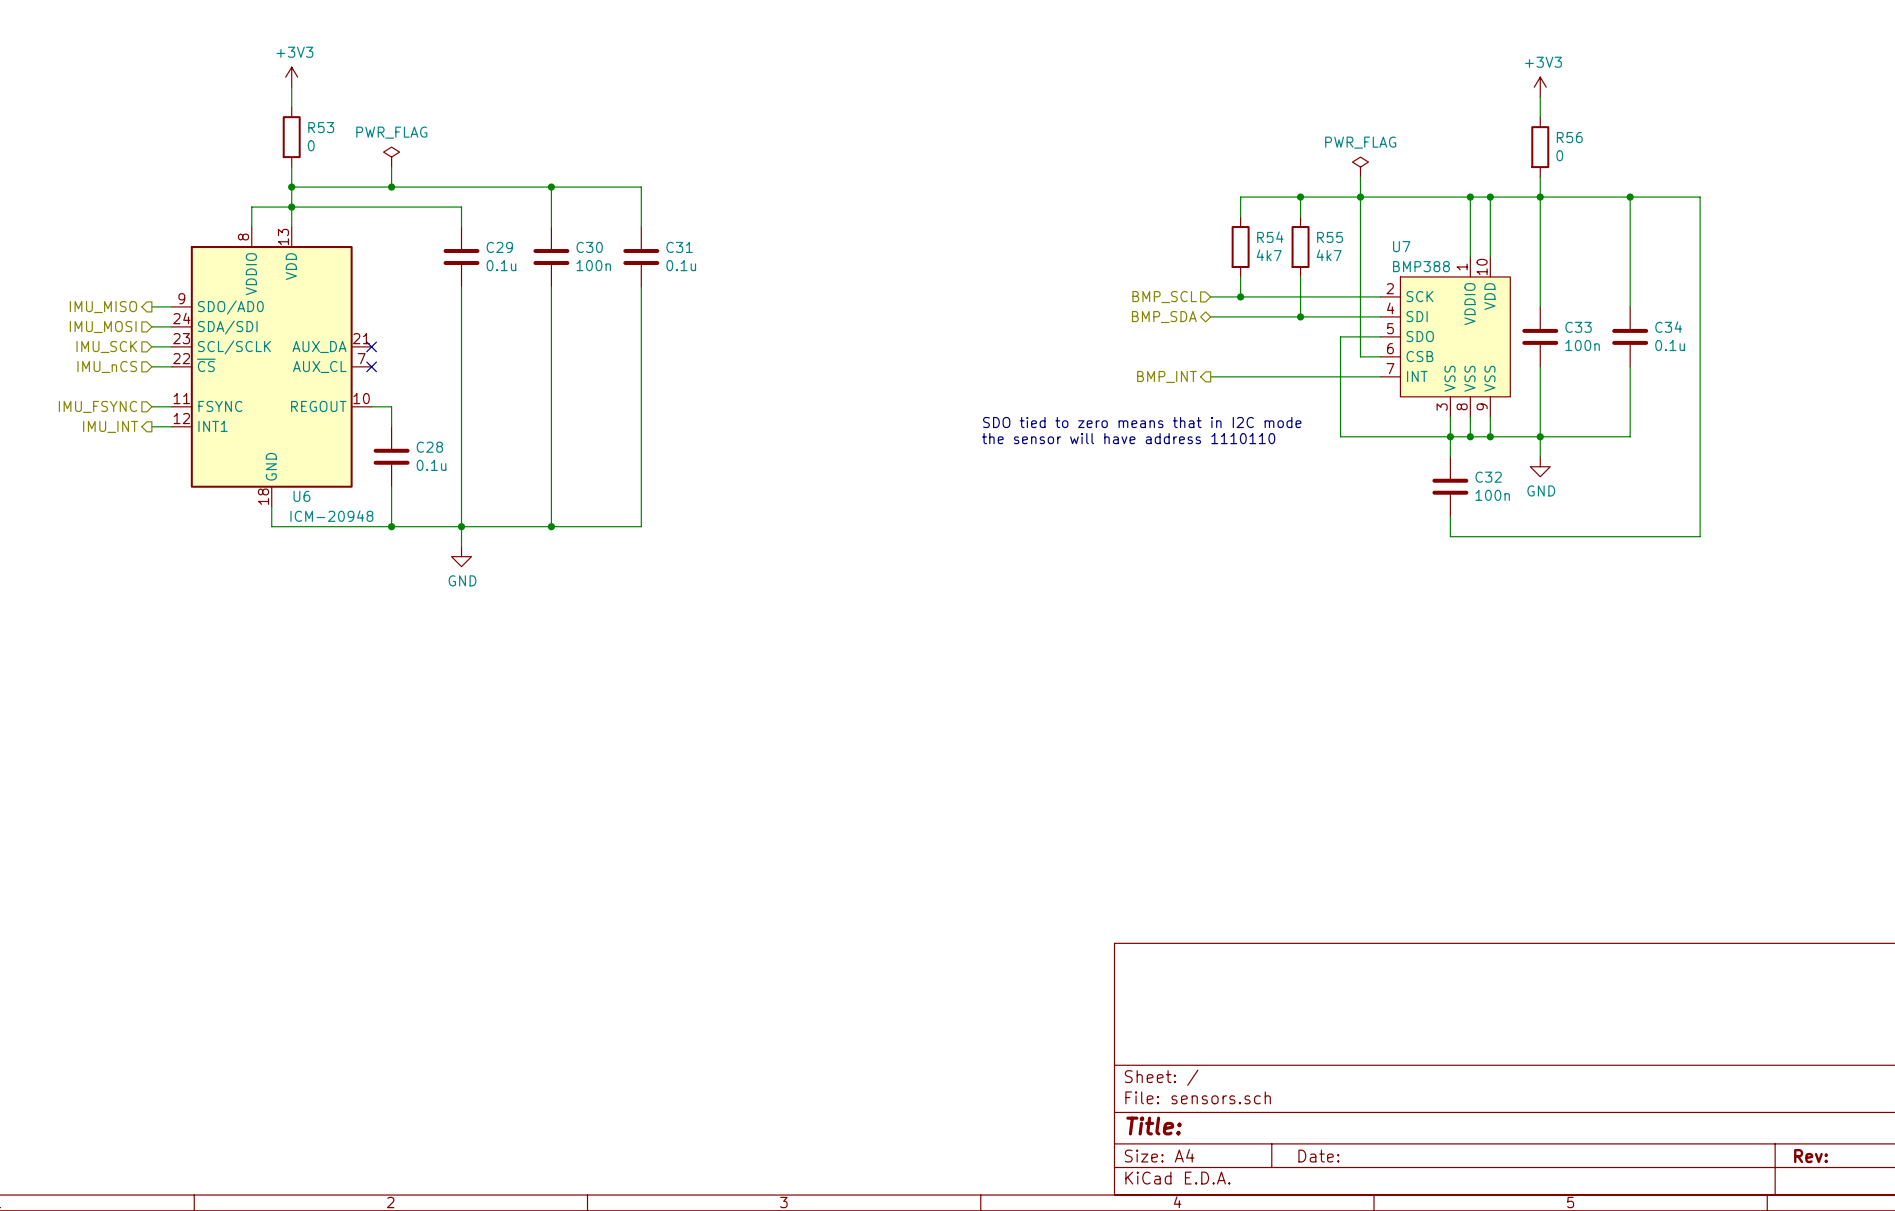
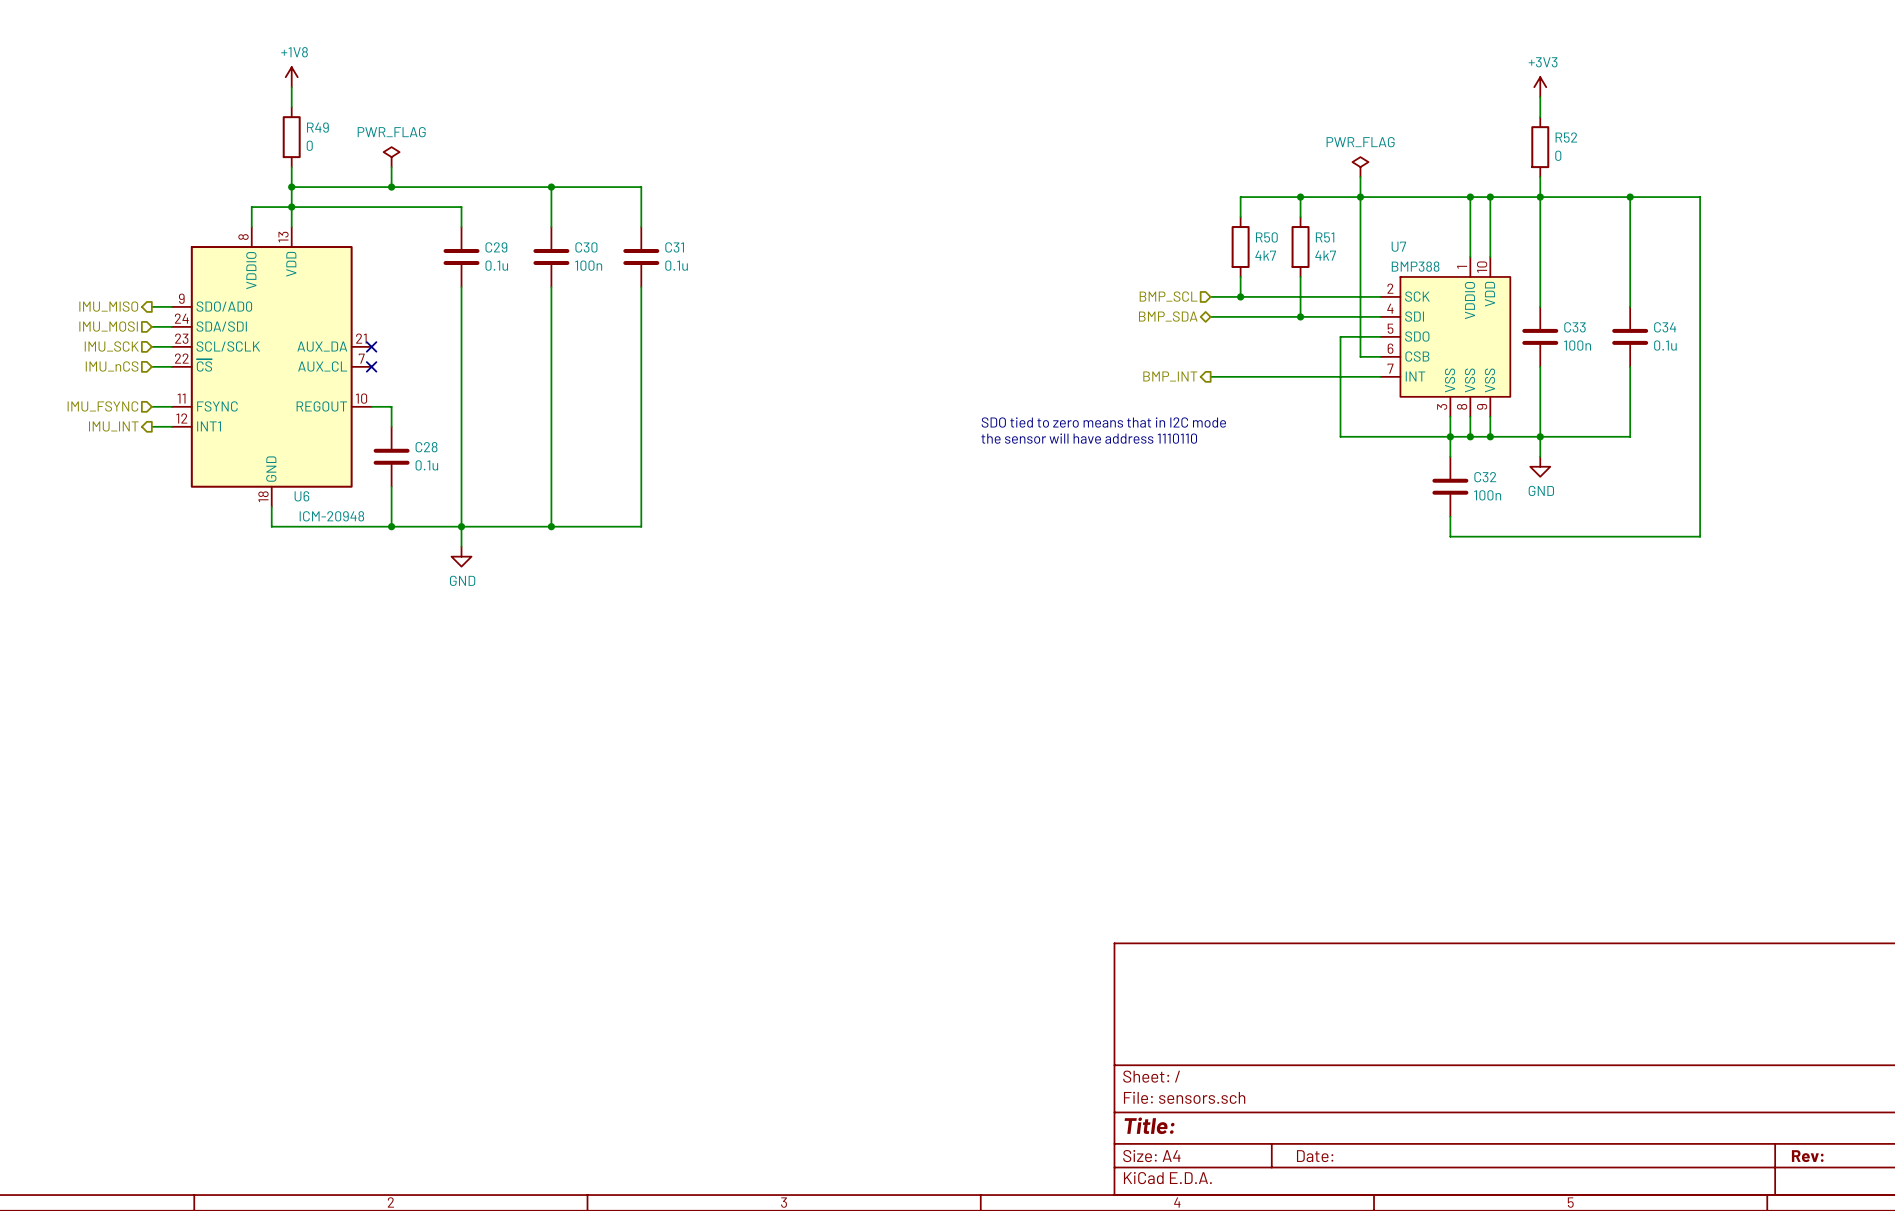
power symbol: +3V3 (291, 77) -> +1V8 (291, 77)
R53 name: R53 (321, 127) -> R49 (317, 127)
R56 name: R56 (1569, 137) -> R52 (1566, 137)
R54 name: R54 (1270, 237) -> R50 (1266, 237)
R55 name: R55 (1330, 237) -> R51 (1325, 237)

